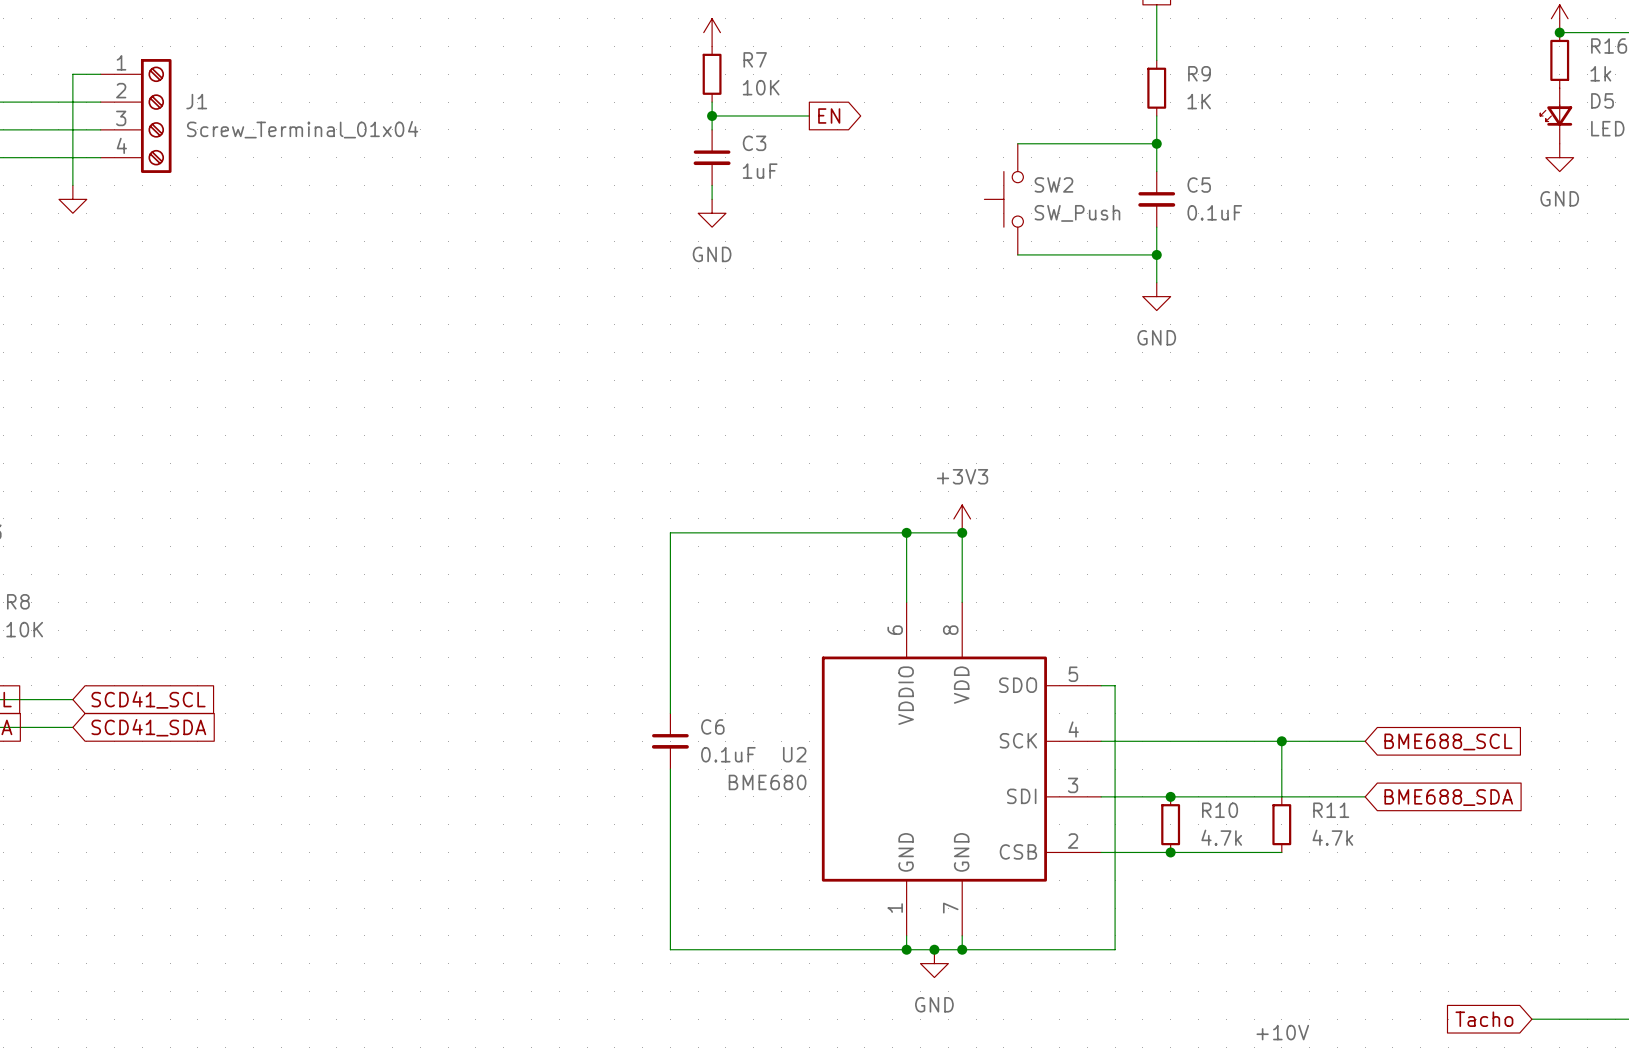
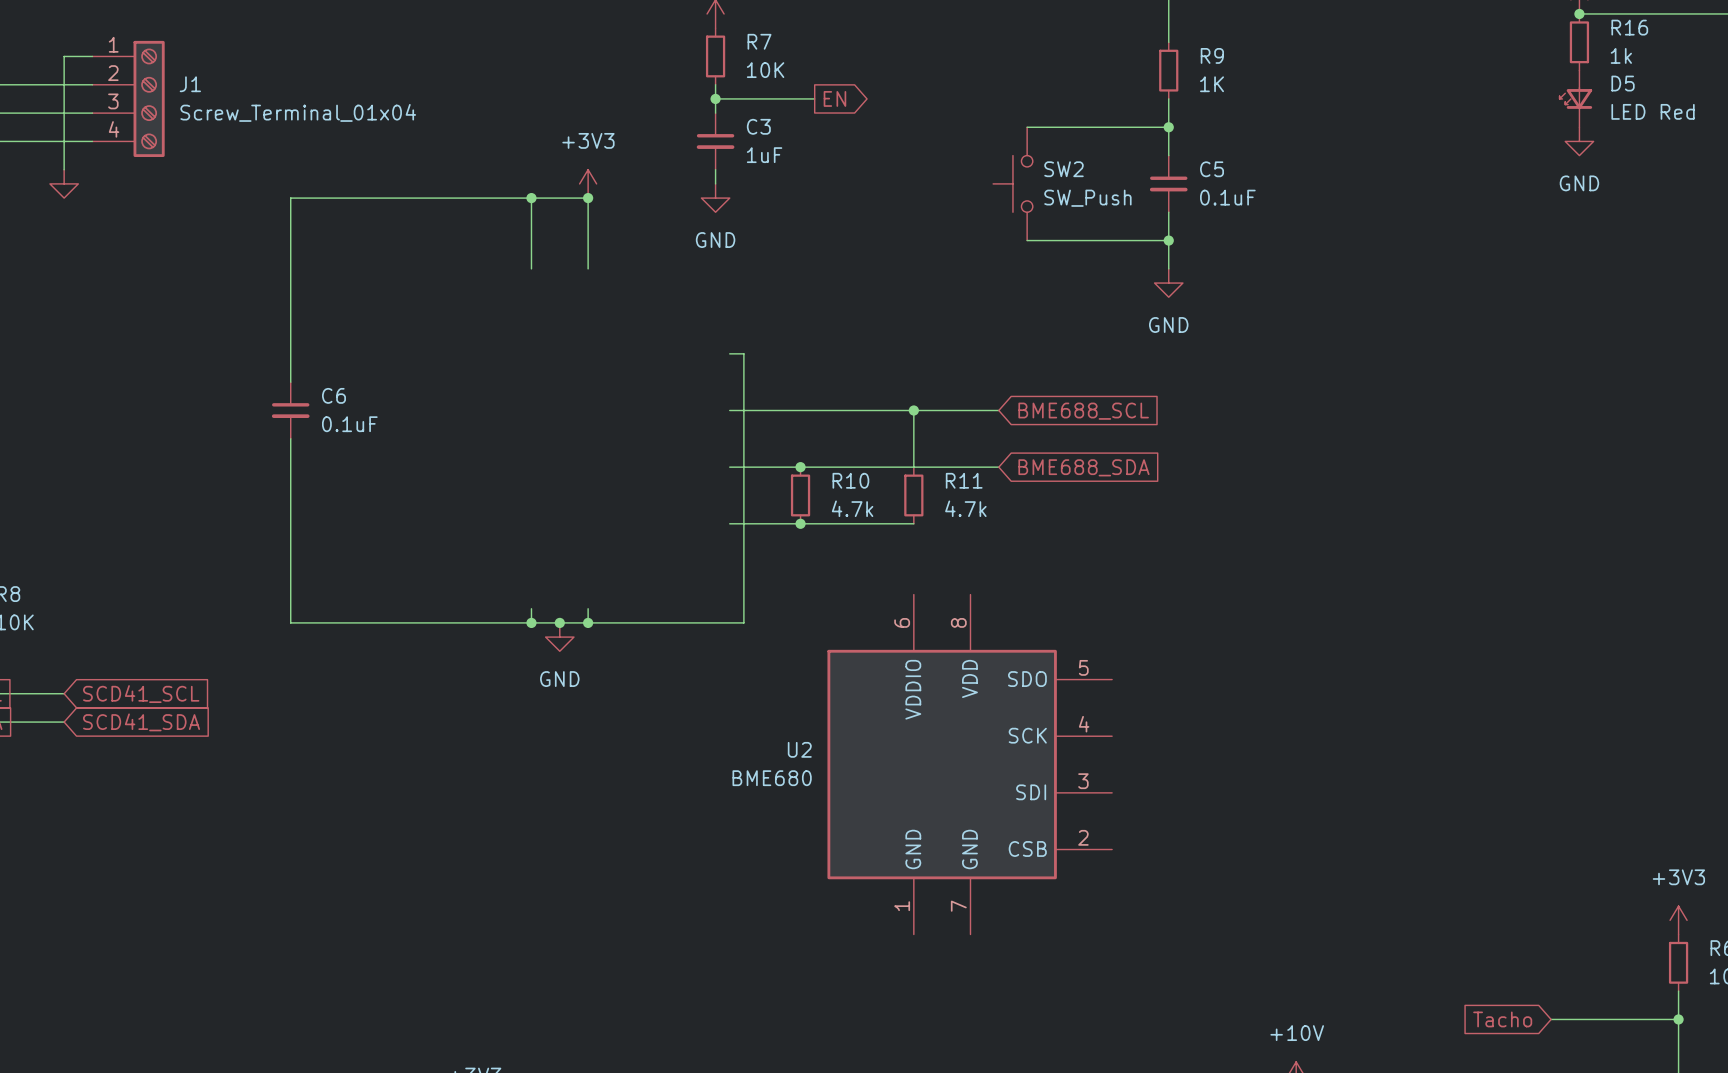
power symbol: none -> +3V3 (588, 183)
wire: none -> (531, 198) (531, 268)
junction: none -> (531, 198)
junction: none -> (588, 198)
wire: none -> (588, 268) (588, 198) (290, 198) (290, 382)
wire: none -> (729, 353) (743, 353) (743, 622) (290, 622) (290, 438)
wire: none -> (729, 410) (998, 410)
wire: none -> (913, 410) (913, 467)
junction: none -> (913, 410)
global label: none -> BME688_SCL (1083, 411)
wire: none -> (729, 467) (998, 467)
junction: none -> (800, 467)
global label: none -> BME688_SDA (1083, 467)
power symbol: +3V3 (962, 518) -> none
wire: (725, 532) (670, 532) (670, 713) -> none
junction: none -> (800, 523)
junction: (906, 532) -> none
junction: (962, 532) -> none
wire: (906, 602) (906, 532) (962, 532) (962, 602) -> none
wire: none -> (531, 608) (531, 622)
wire: none -> (588, 608) (588, 622)
junction: none -> (531, 622)
junction: none -> (559, 622)
junction: none -> (588, 622)
power symbol: none -> GND (559, 637)
wire: (1101, 685) (1115, 685) (1115, 949) (670, 949) (670, 769) -> none
C6 position: (670, 741) -> (290, 410)
wire: (1101, 741) (1365, 741) -> none
wire: (1281, 741) (1281, 796) -> none
junction: (1281, 741) -> none
global label: BME688_SCL (1448, 741) -> none
wire: (1101, 796) (1365, 796) -> none
junction: (1170, 796) -> none
global label: BME688_SDA (1448, 797) -> none
R10 position: (1170, 824) -> (800, 495)
R11 position: (1281, 824) -> (913, 495)
wire: (1101, 852) (1281, 852) -> none
junction: (1170, 852) -> none
wire: (906, 935) (906, 949) -> none
wire: (962, 935) (962, 949) -> none
junction: (906, 949) -> none
junction: (934, 949) -> none
junction: (962, 949) -> none
power symbol: GND (934, 963) -> none

